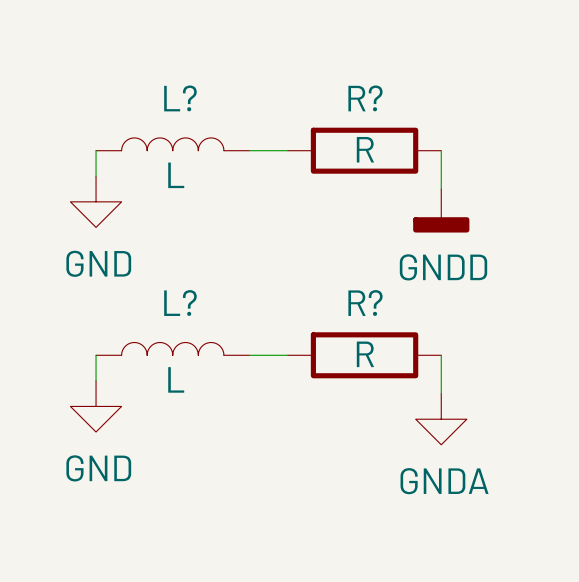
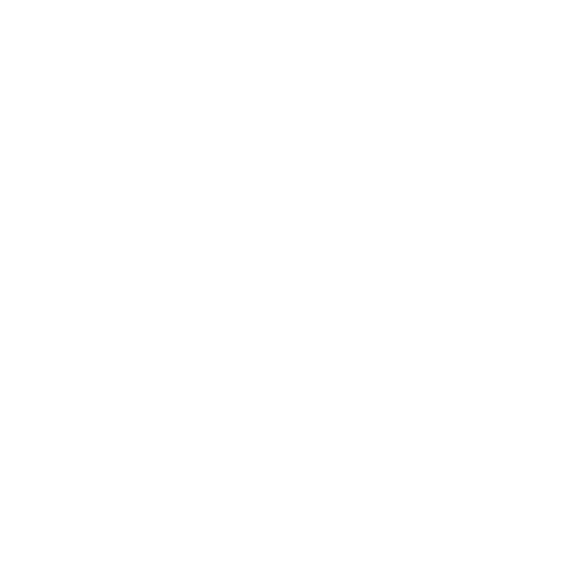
L?: L (172, 144) -> none
wire: (96, 150) (96, 176) -> none
wire: (249, 150) (287, 150) -> none
R?: R (364, 150) -> none
wire: (441, 150) (441, 189) -> none
power symbol: GND (96, 201) -> none
power symbol: GNDD (441, 210) -> none
L?: L (172, 348) -> none
wire: (96, 355) (96, 380) -> none
wire: (249, 355) (287, 355) -> none
R?: R (364, 355) -> none
wire: (441, 355) (441, 393) -> none
power symbol: GND (96, 406) -> none
power symbol: GNDA (441, 419) -> none

